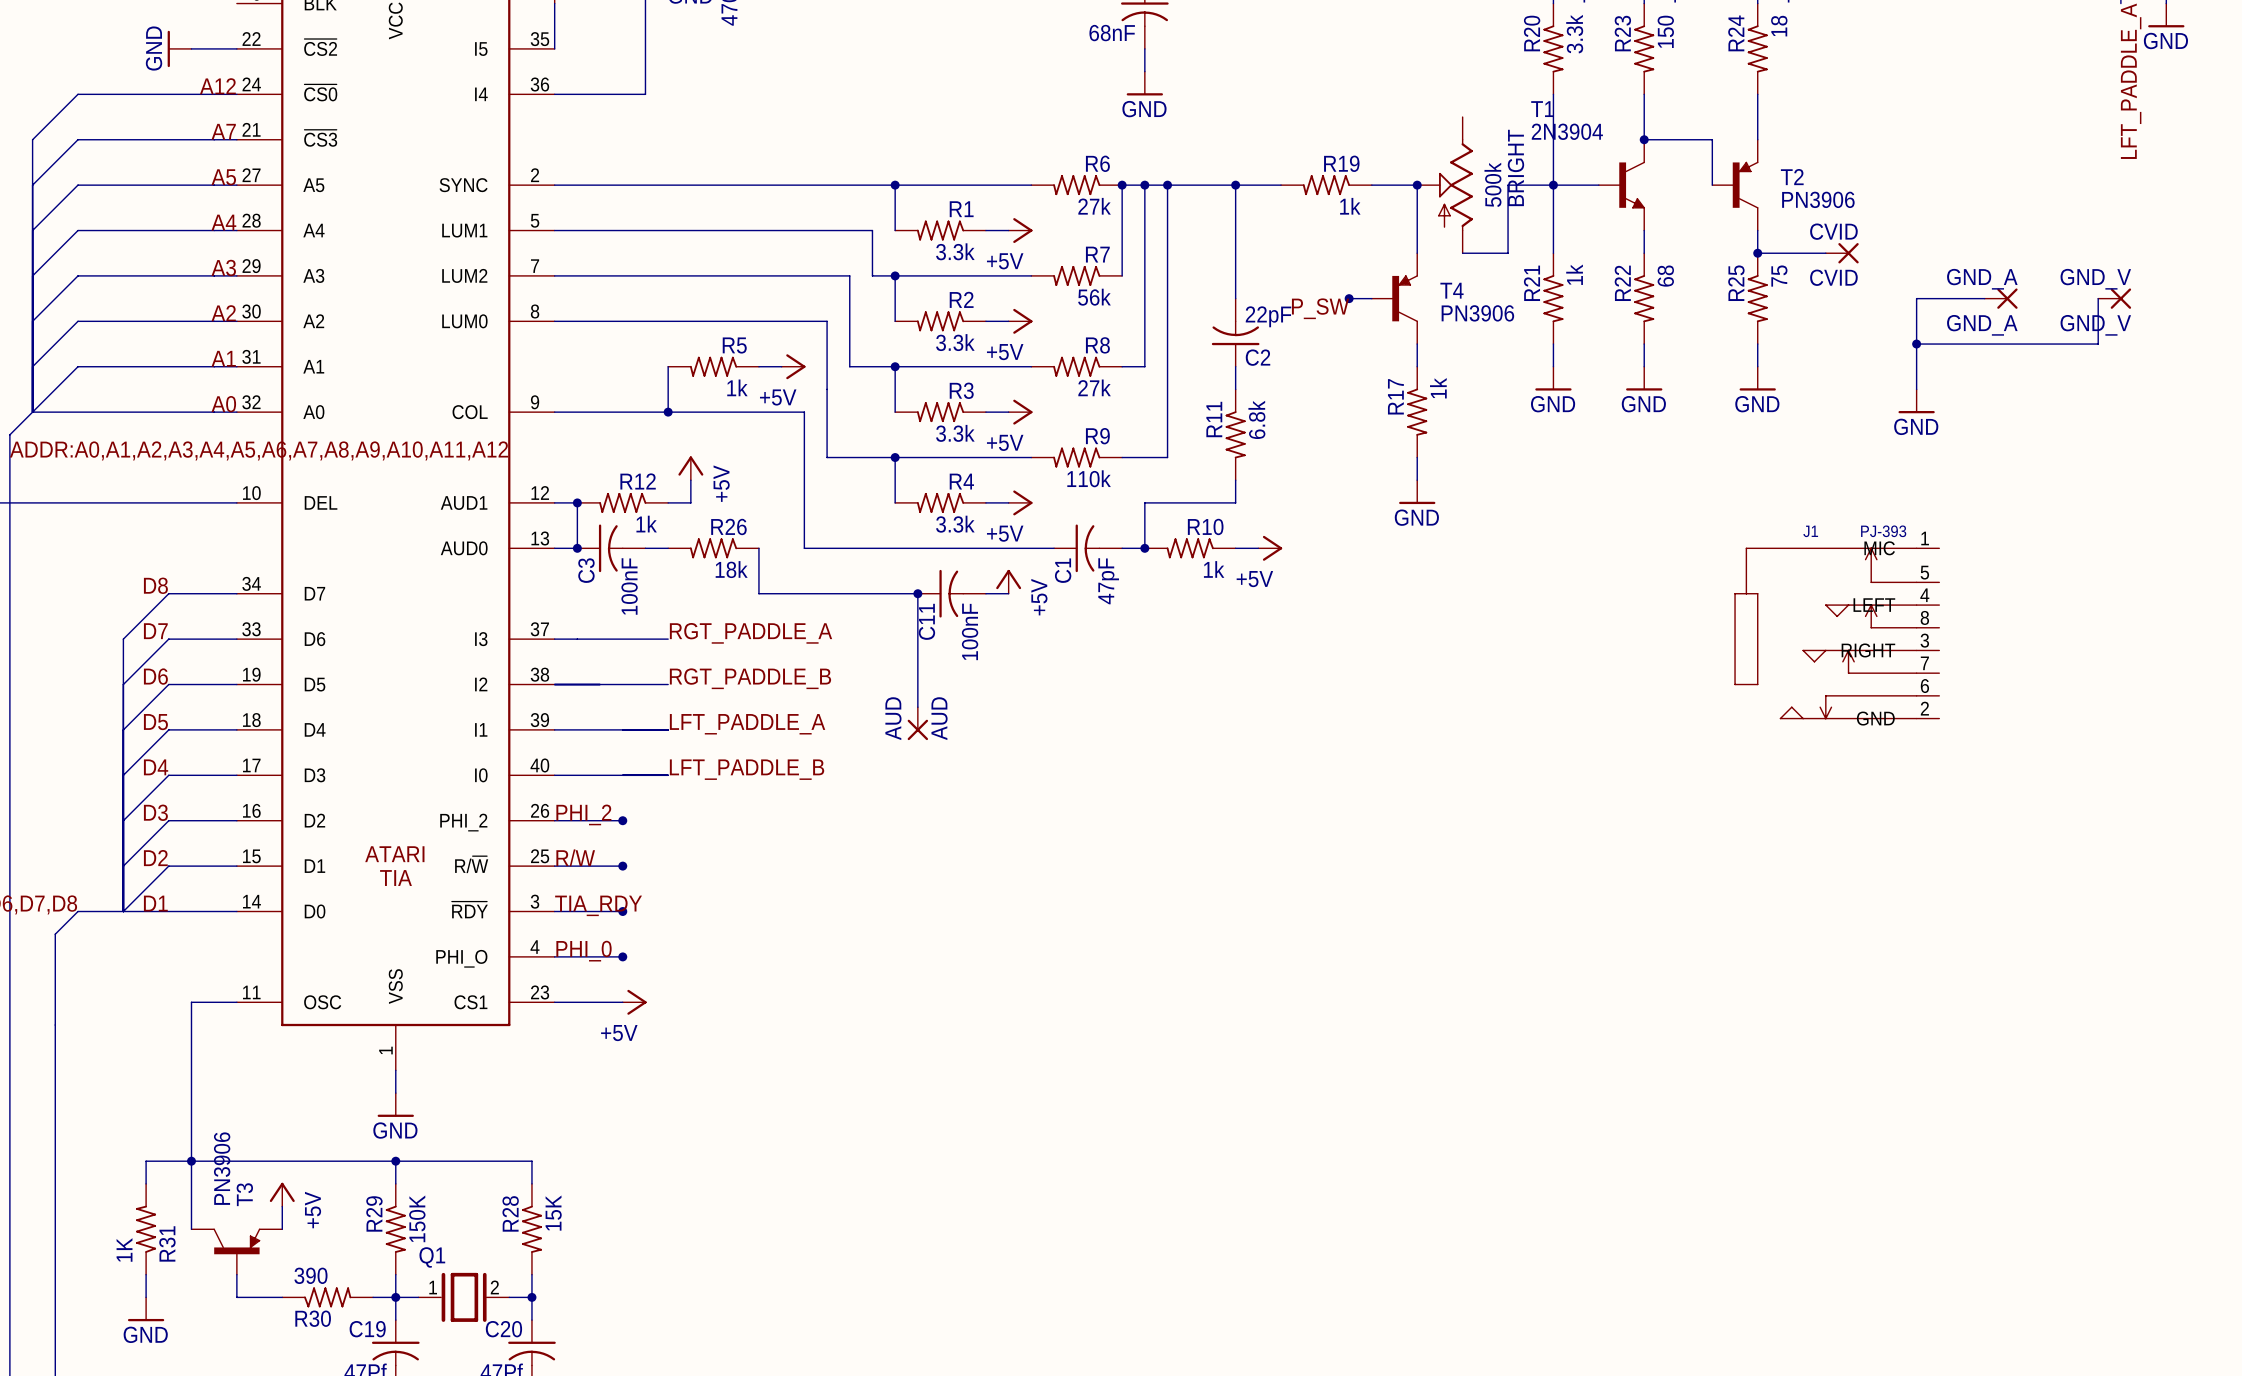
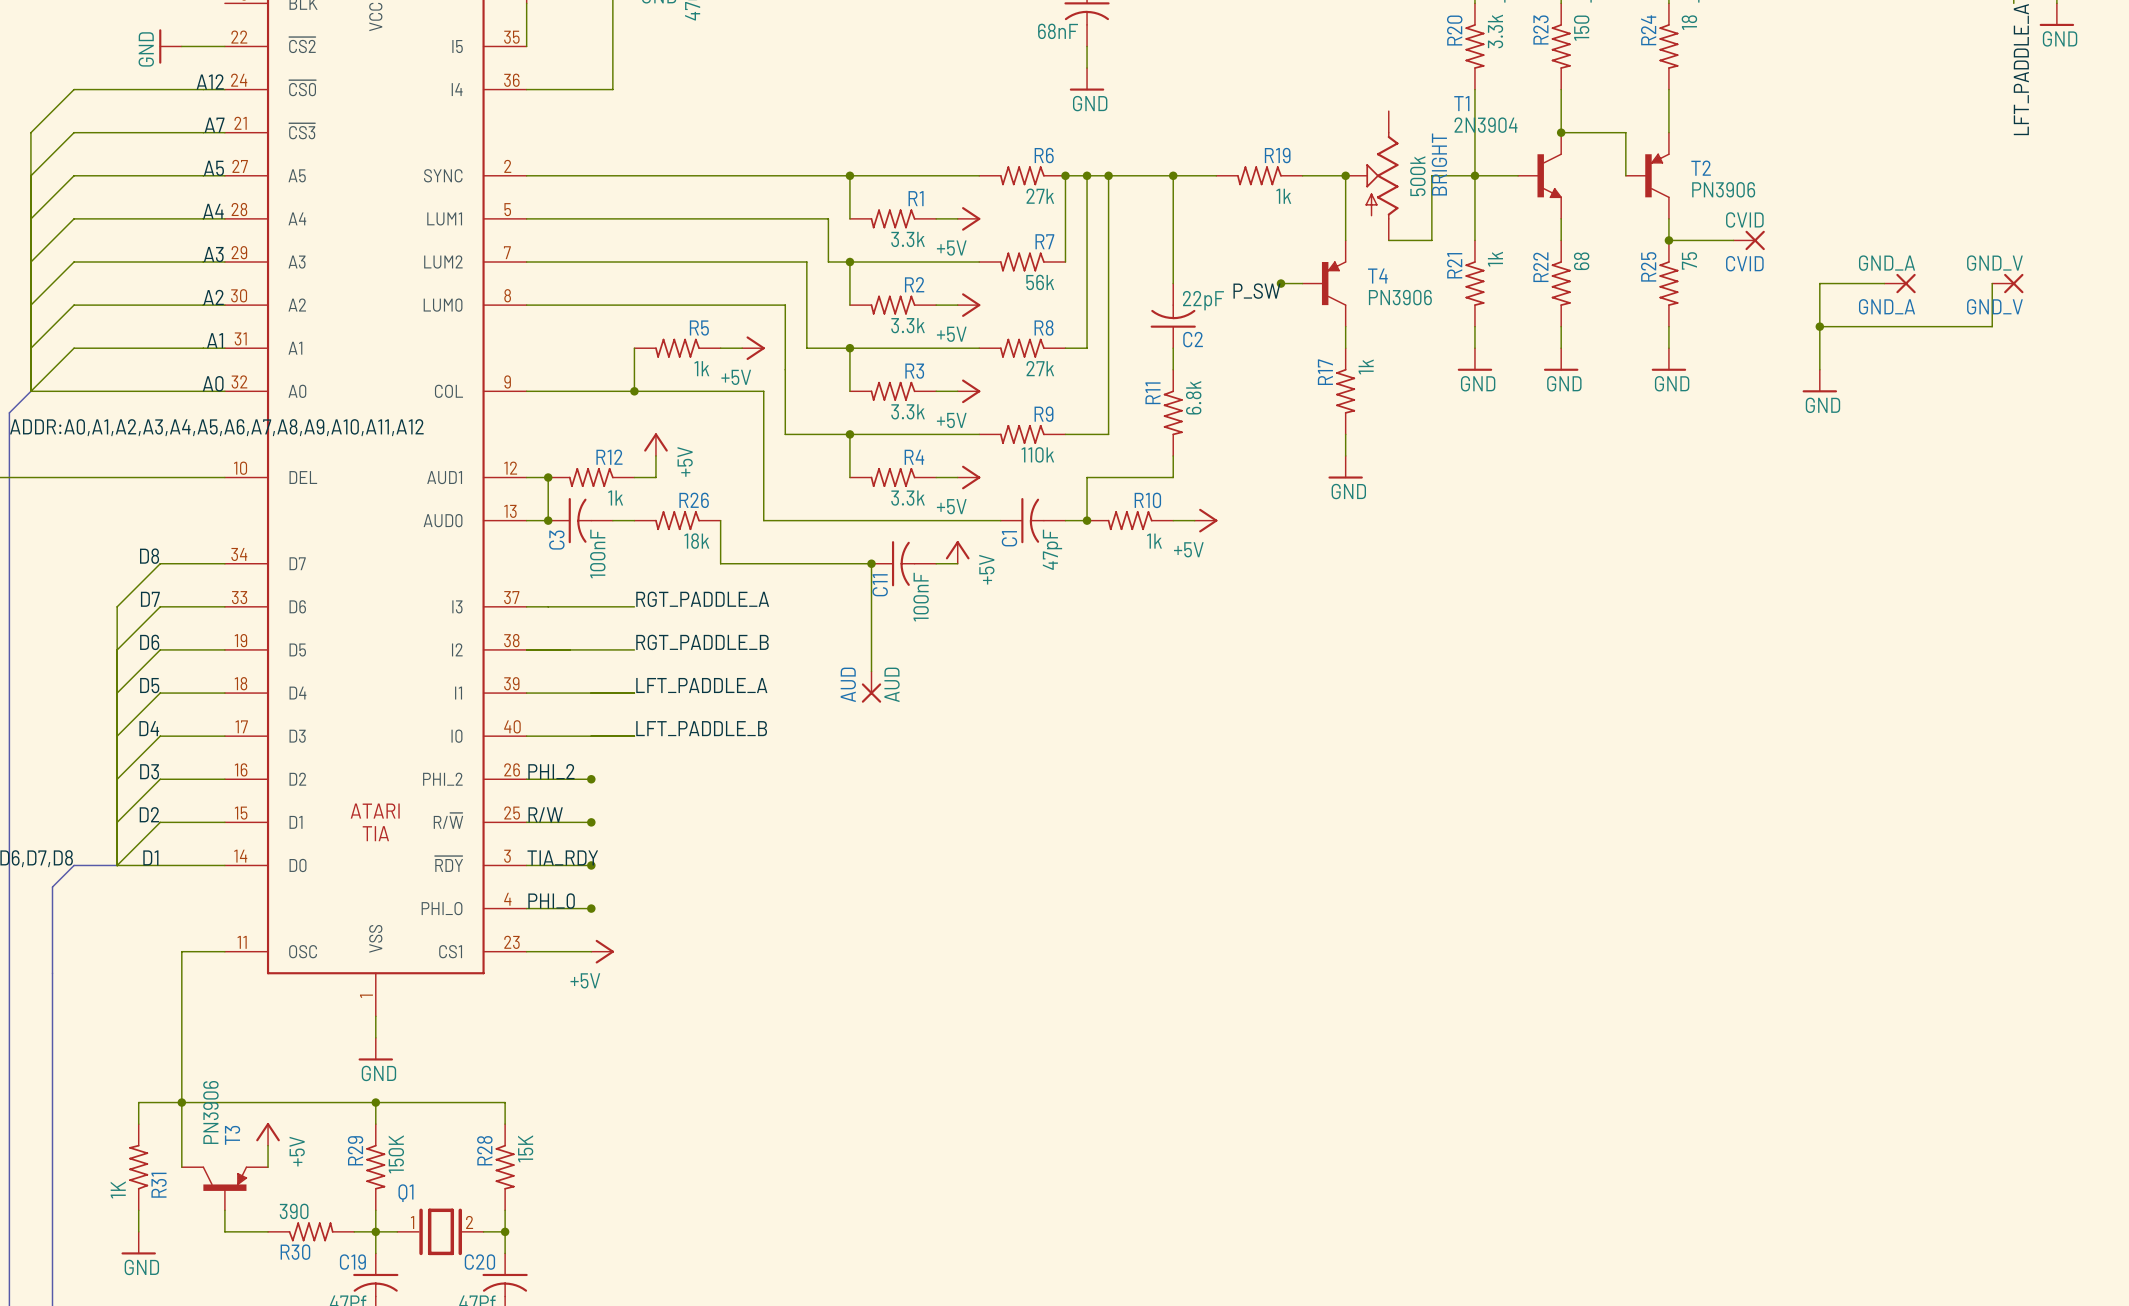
J1: PJ-393 (1836, 633) -> none

